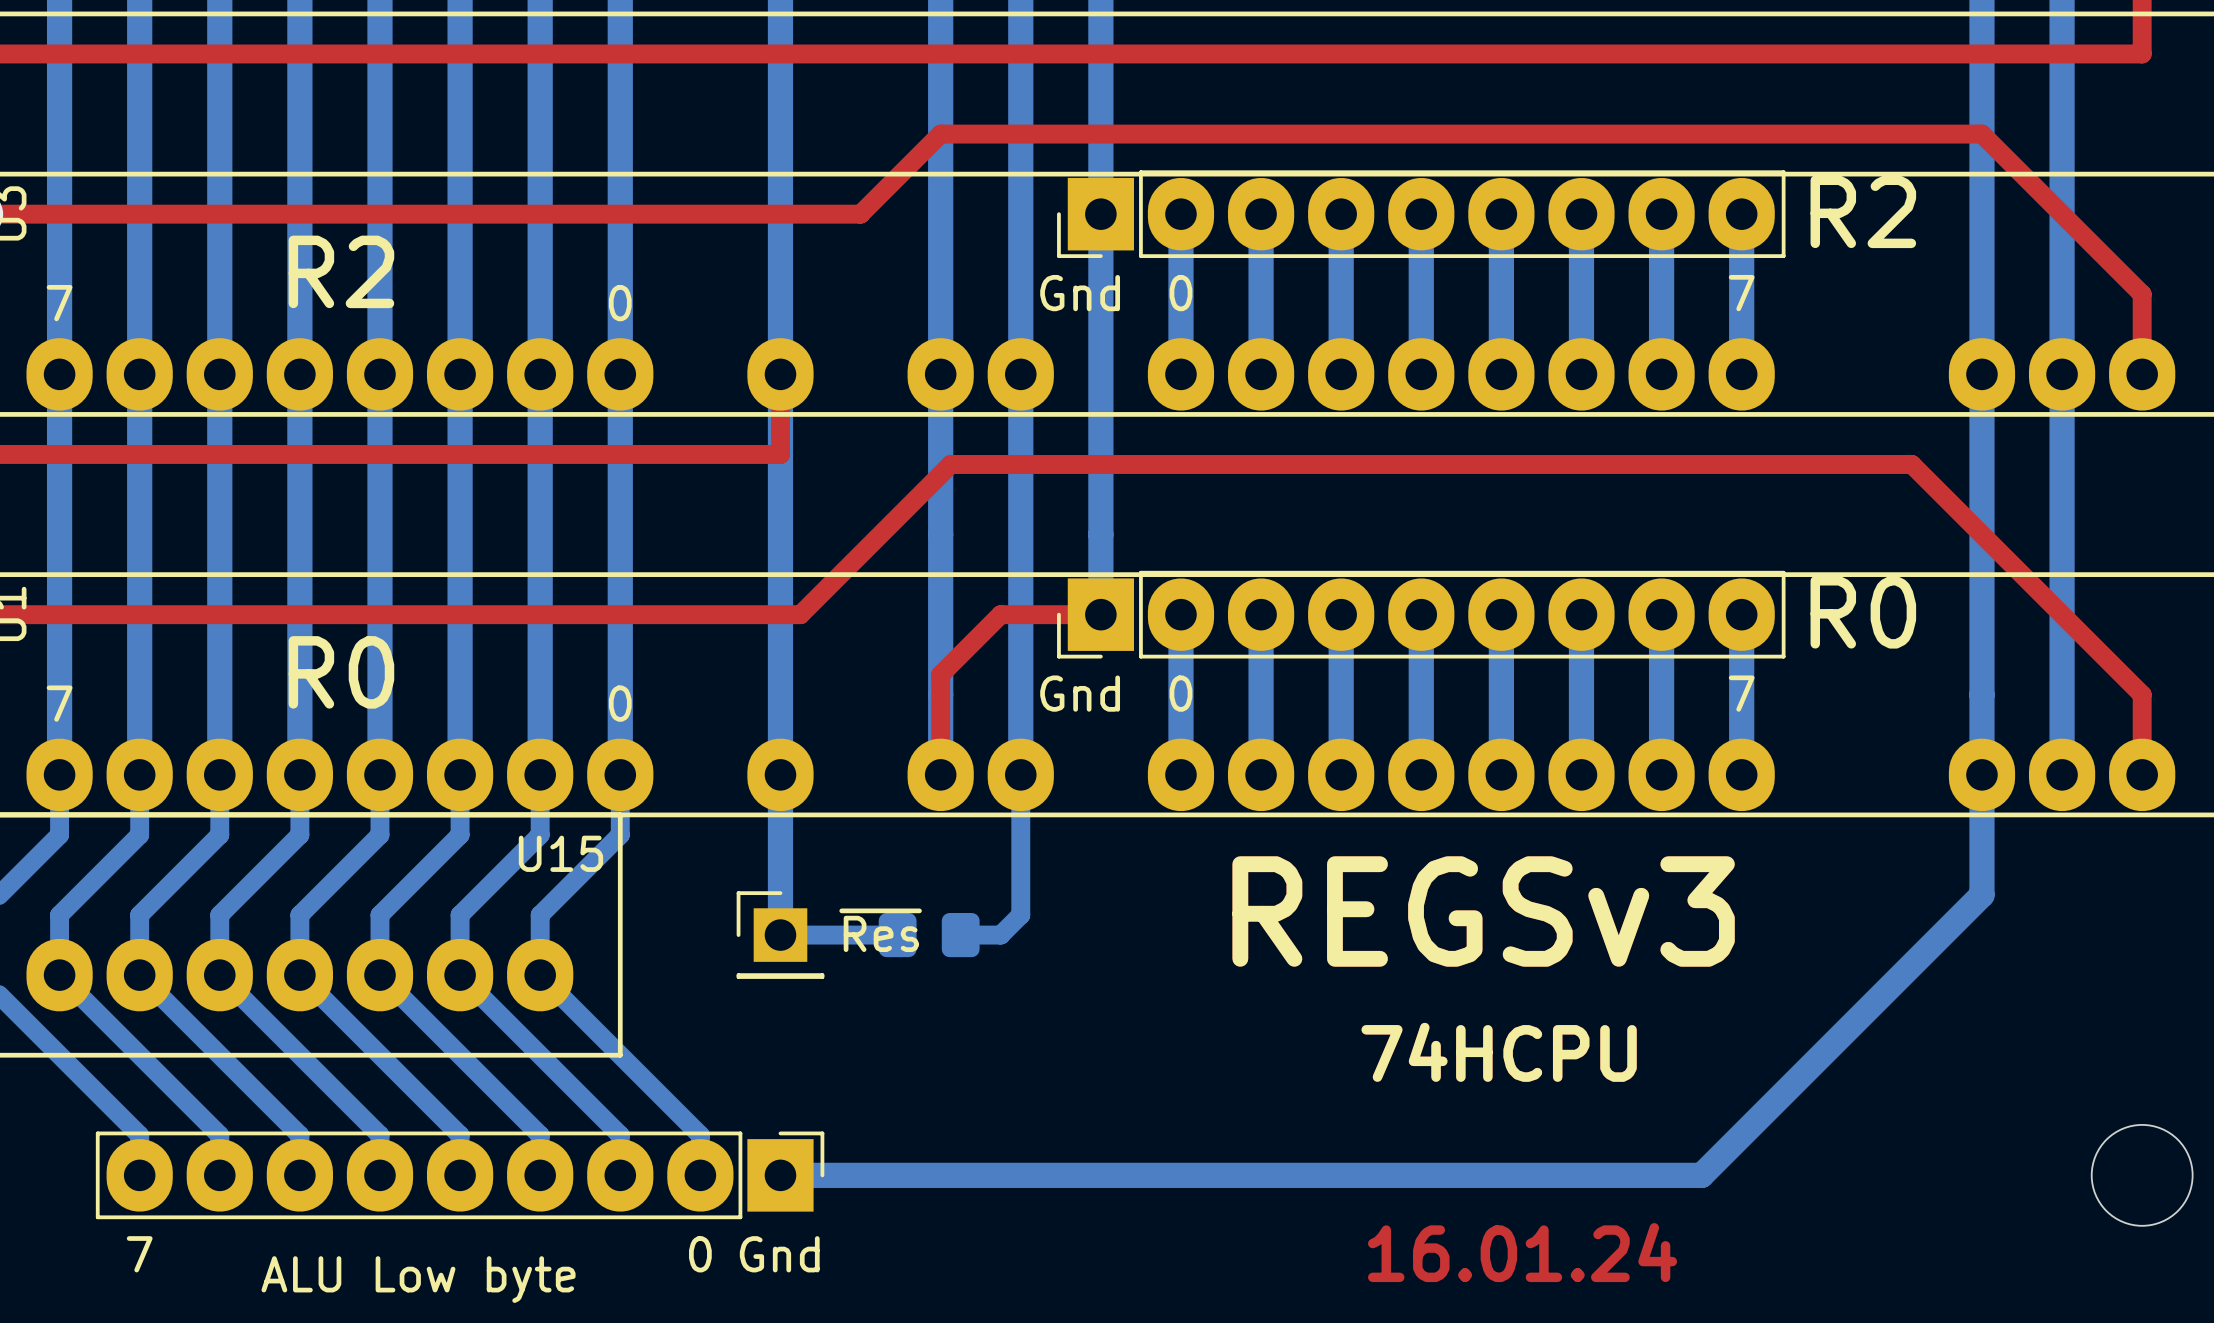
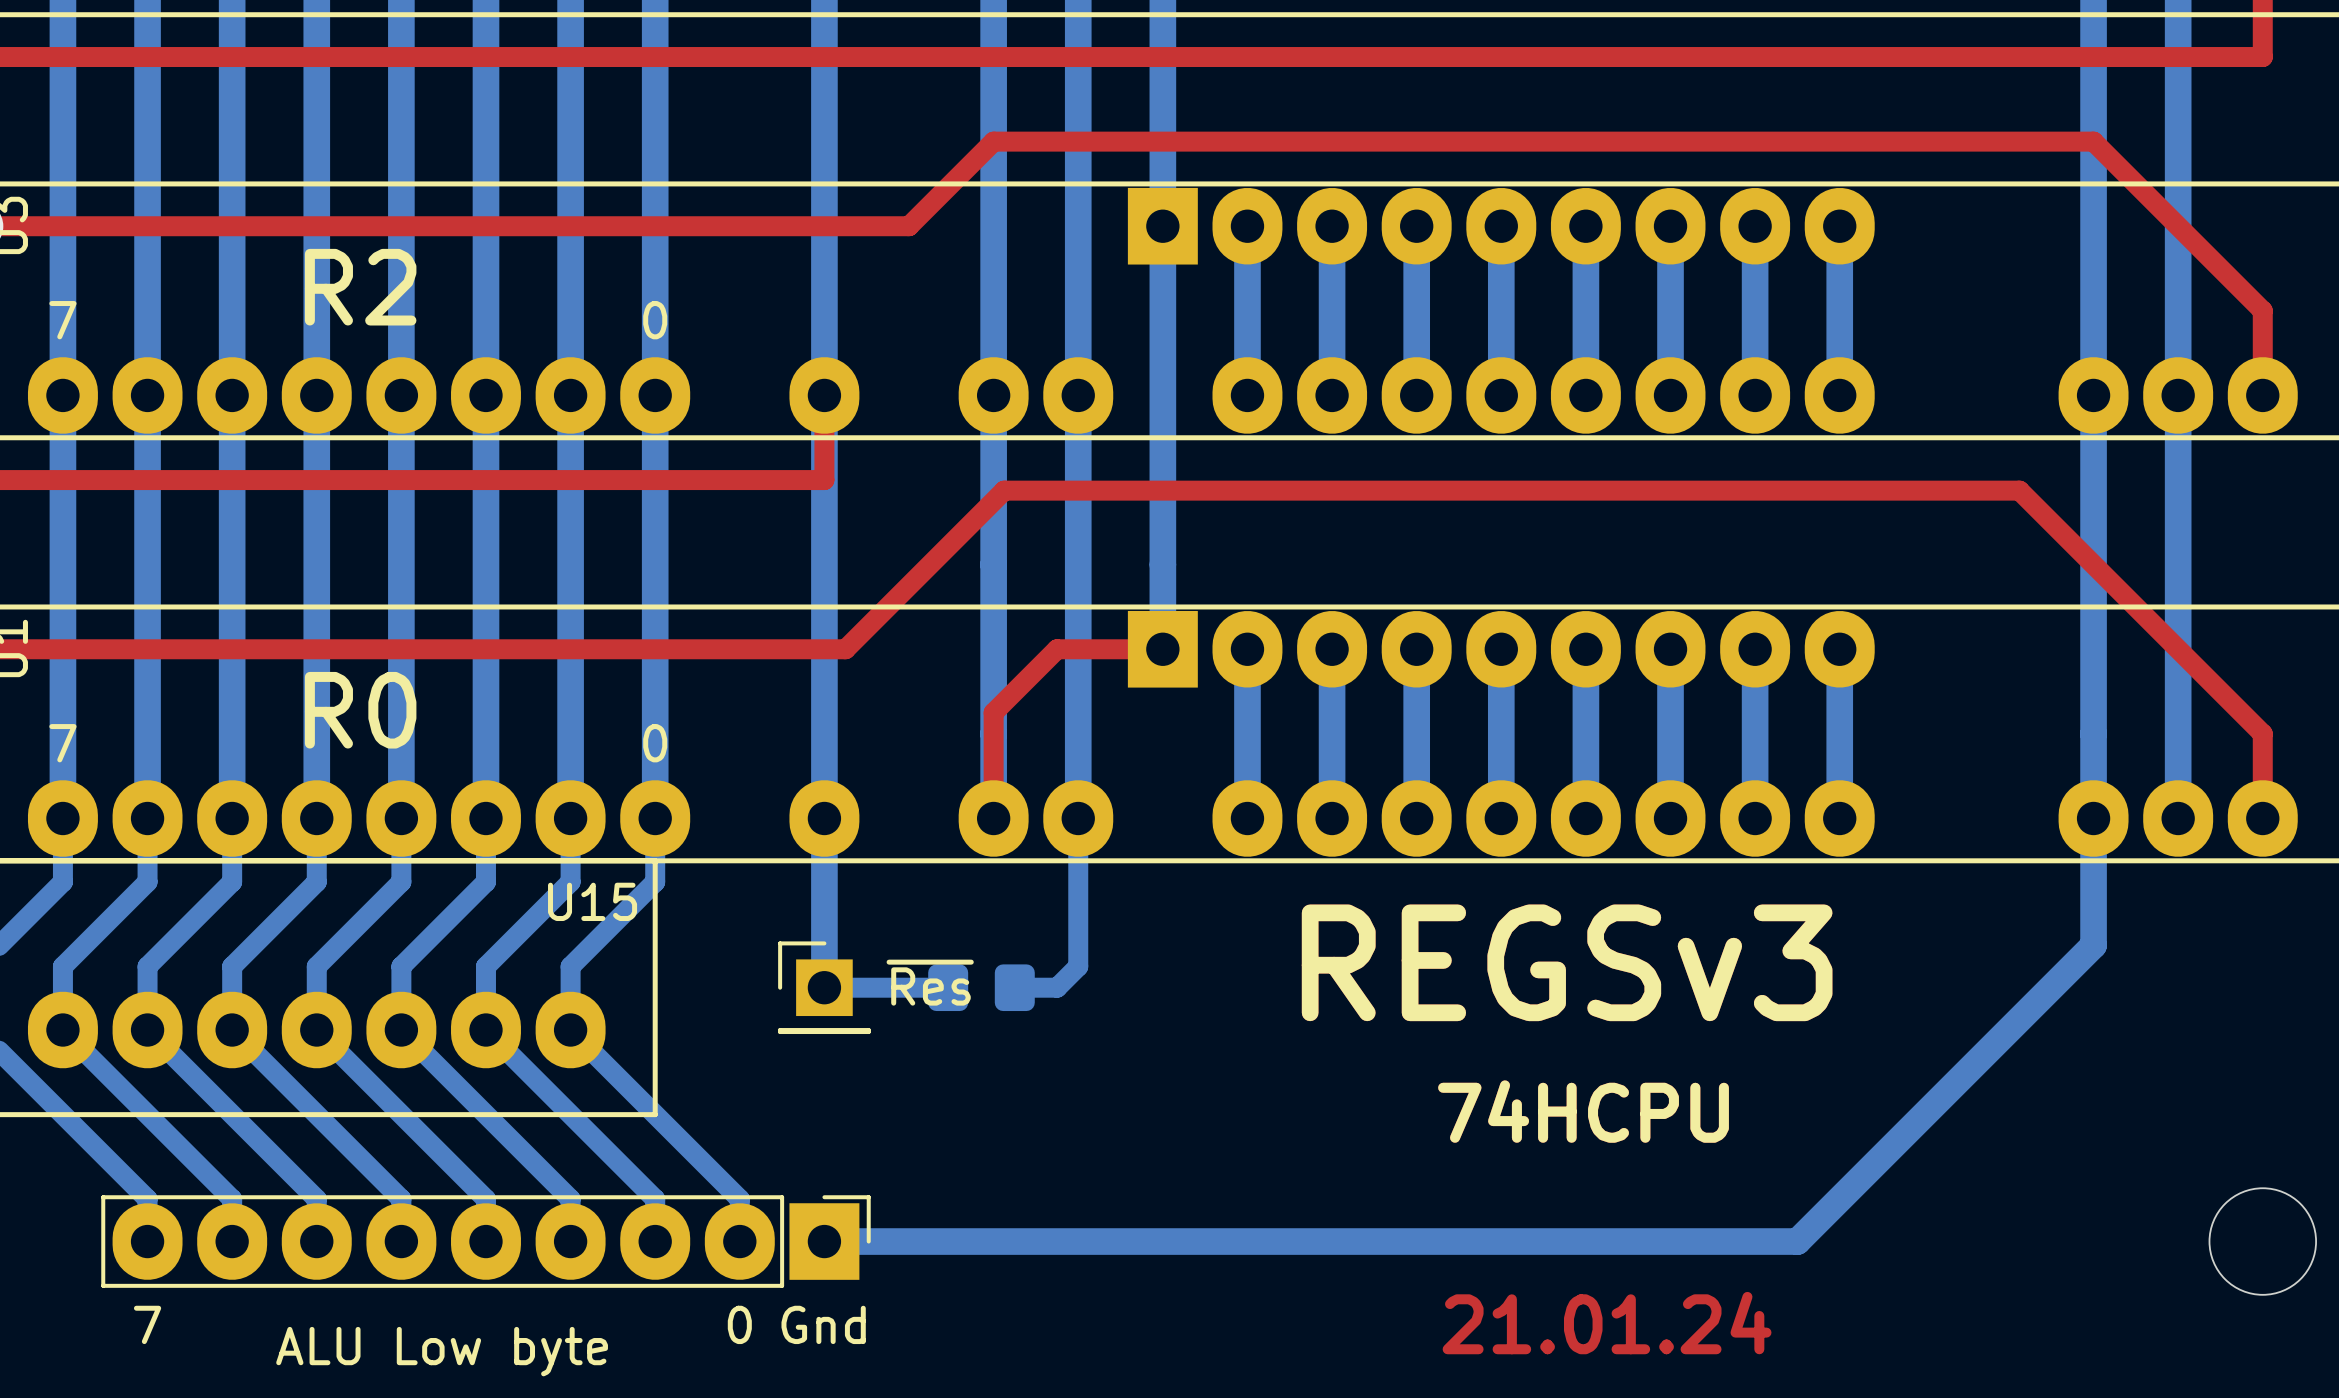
text: R2 (1863, 211) -> none
part side: top (1421, 214) -> bottom (1501, 226)
text: Gnd (1080, 293) -> none
text: 0 (1180, 293) -> none
text: 7 (1741, 293) -> none
text: R0 (1863, 612) -> none
part side: top (1421, 614) -> bottom (1501, 649)
text: Gnd (1080, 693) -> none
text: 0 (1180, 693) -> none
text: 7 (1741, 693) -> none
text: 16.01.24 (1522, 1252) -> 21.01.24 (1607, 1323)

